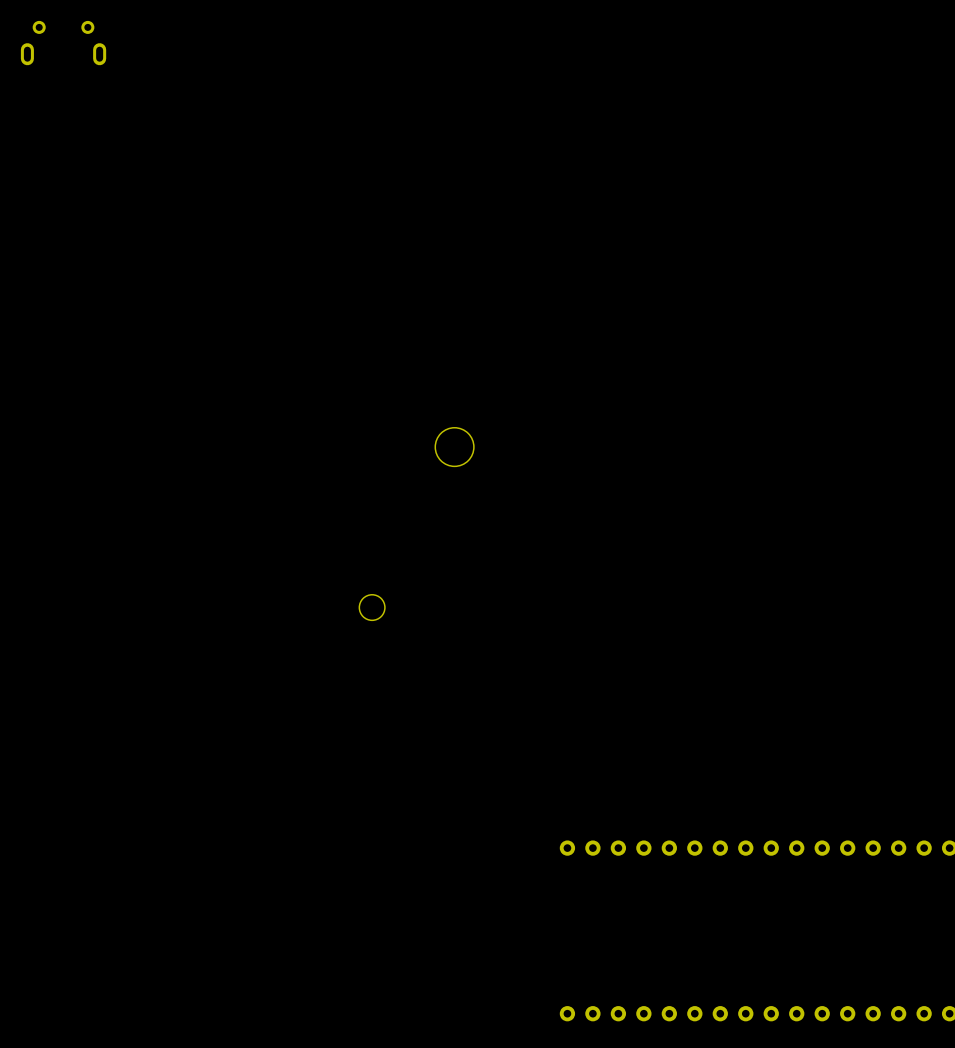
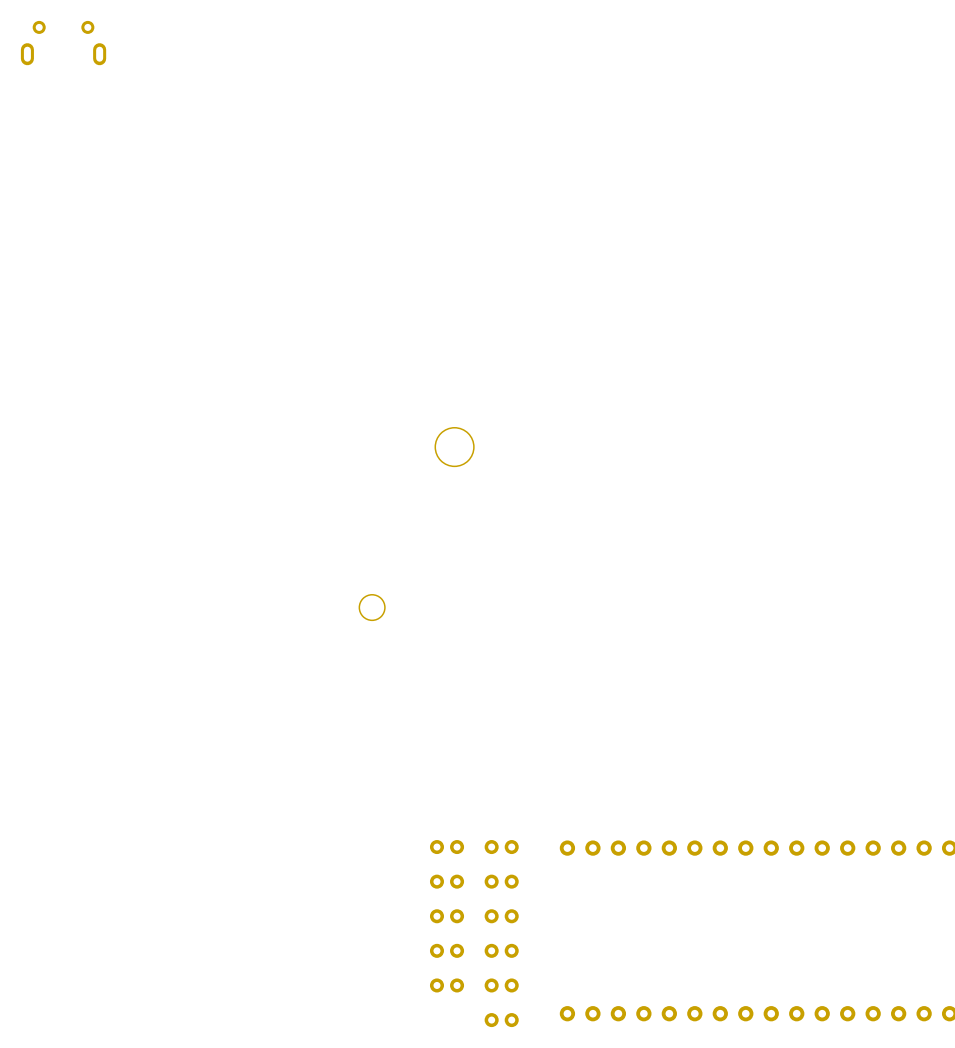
part: none -> (447, 847)
part: none -> (501, 847)
part: none -> (447, 881)
part: none -> (501, 881)
part: none -> (447, 916)
part: none -> (501, 916)
part: none -> (447, 950)
part: none -> (501, 950)
part: none -> (447, 985)
part: none -> (501, 985)
part: none -> (501, 1020)

